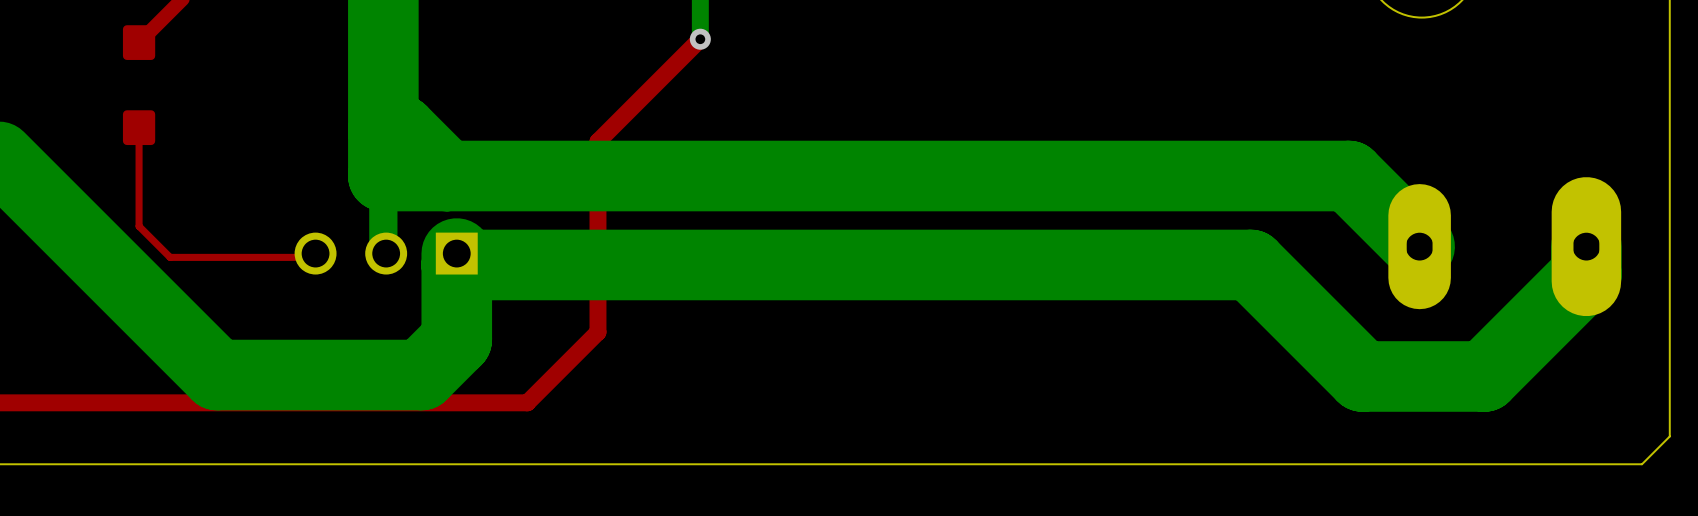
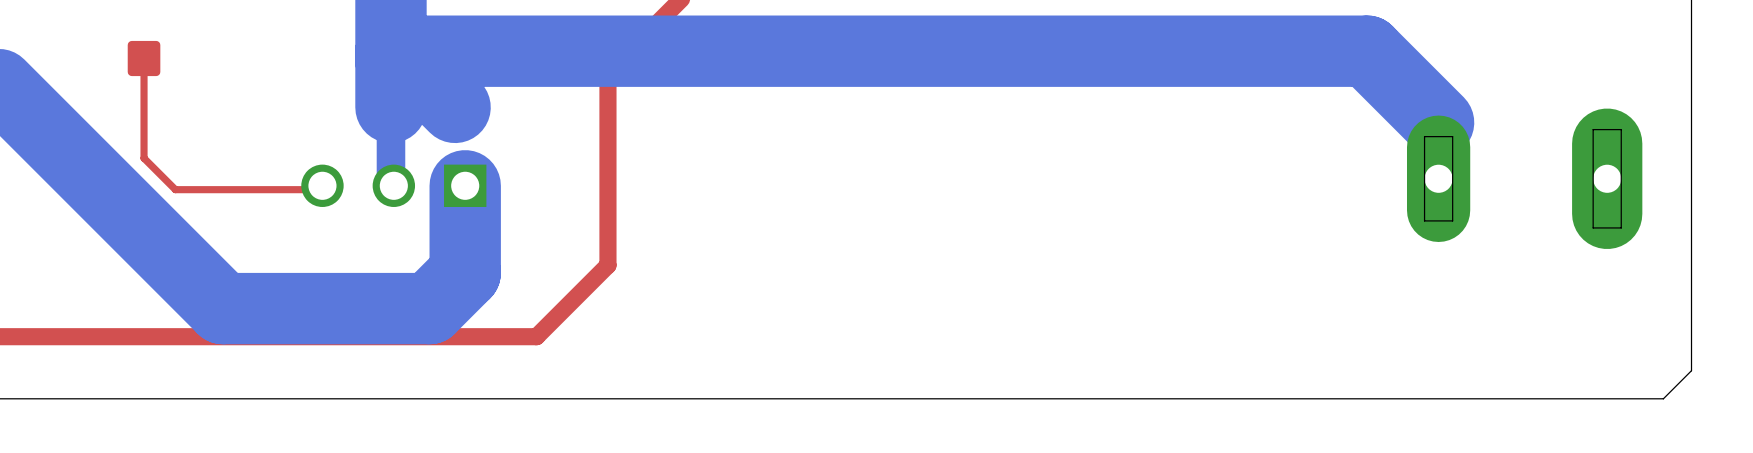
bottom track: (383, 176) (1349, 176) (1419, 246) -> (390, 51) (1367, 51) (1438, 122)
bottom track: (456, 264) (1250, 264) (1362, 376) (1484, 376) (1586, 274) (1586, 246) (1586, 249) (1518, 317) -> none

